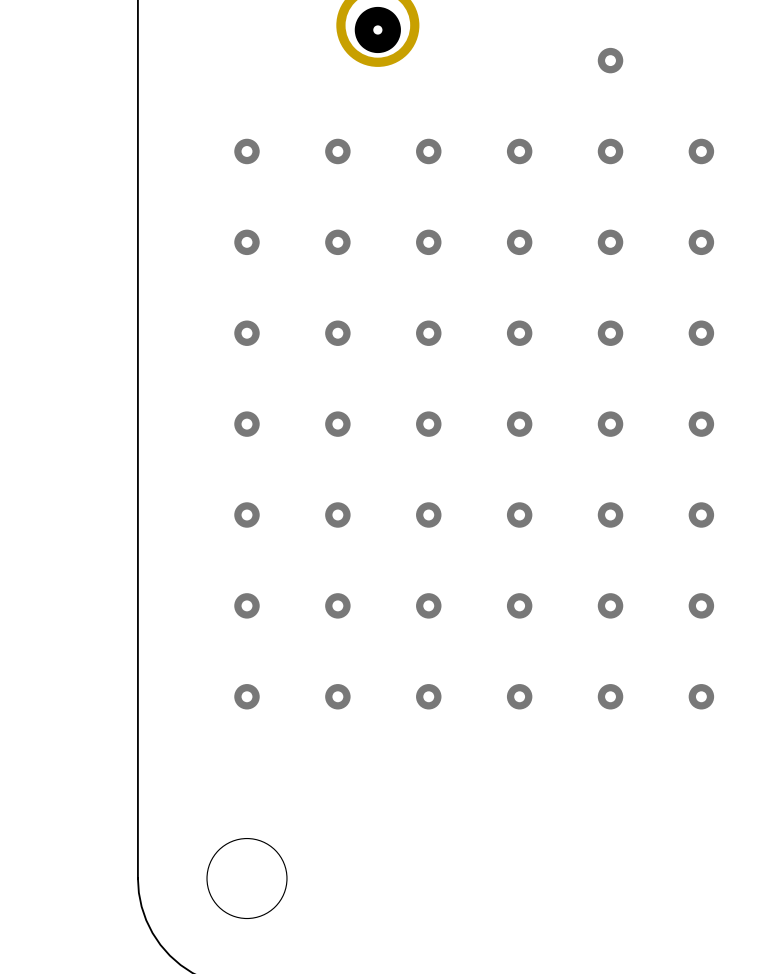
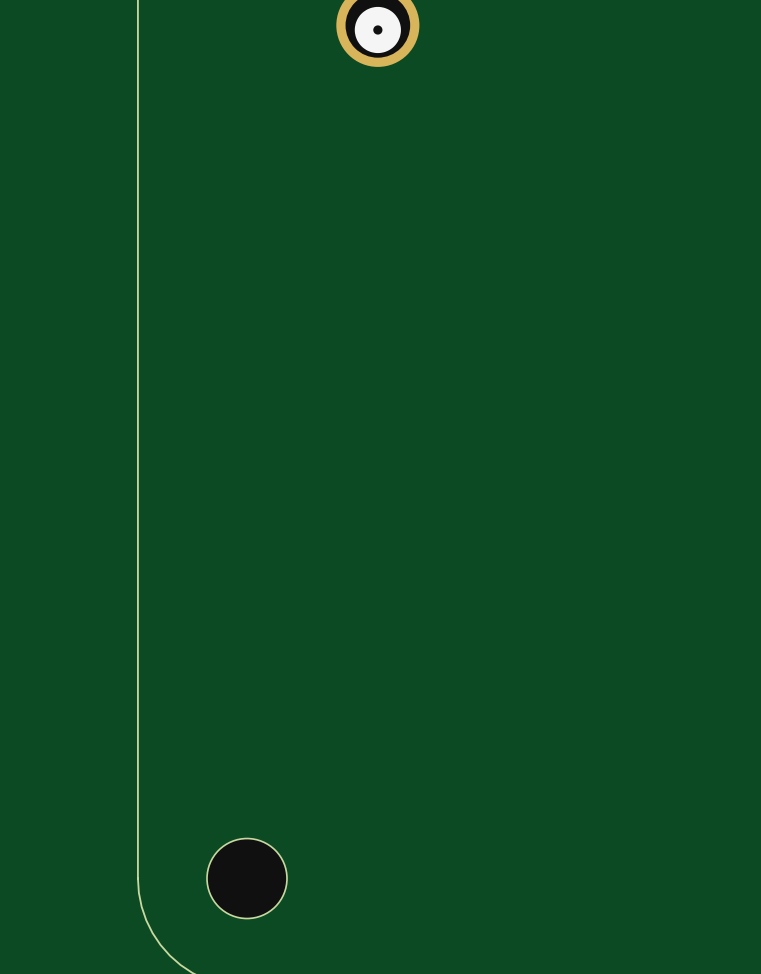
via: (610, 60) -> none
via: (246, 151) -> none
via: (337, 151) -> none
via: (428, 151) -> none
via: (519, 151) -> none
via: (610, 151) -> none
via: (701, 151) -> none
via: (246, 242) -> none
via: (337, 242) -> none
via: (428, 242) -> none
via: (519, 242) -> none
via: (610, 242) -> none
via: (701, 242) -> none
via: (246, 333) -> none
via: (337, 333) -> none
via: (428, 333) -> none
via: (519, 333) -> none
via: (610, 333) -> none
via: (701, 333) -> none
via: (246, 424) -> none
via: (337, 424) -> none
via: (428, 424) -> none
via: (519, 424) -> none
via: (610, 424) -> none
via: (701, 424) -> none
via: (246, 515) -> none
via: (337, 515) -> none
via: (428, 515) -> none
via: (519, 515) -> none
via: (610, 515) -> none
via: (701, 515) -> none
via: (246, 605) -> none
via: (337, 605) -> none
via: (428, 605) -> none
via: (519, 605) -> none
via: (610, 605) -> none
via: (701, 605) -> none
via: (246, 696) -> none
via: (337, 696) -> none
via: (428, 696) -> none
via: (519, 696) -> none
via: (610, 696) -> none
via: (701, 696) -> none

